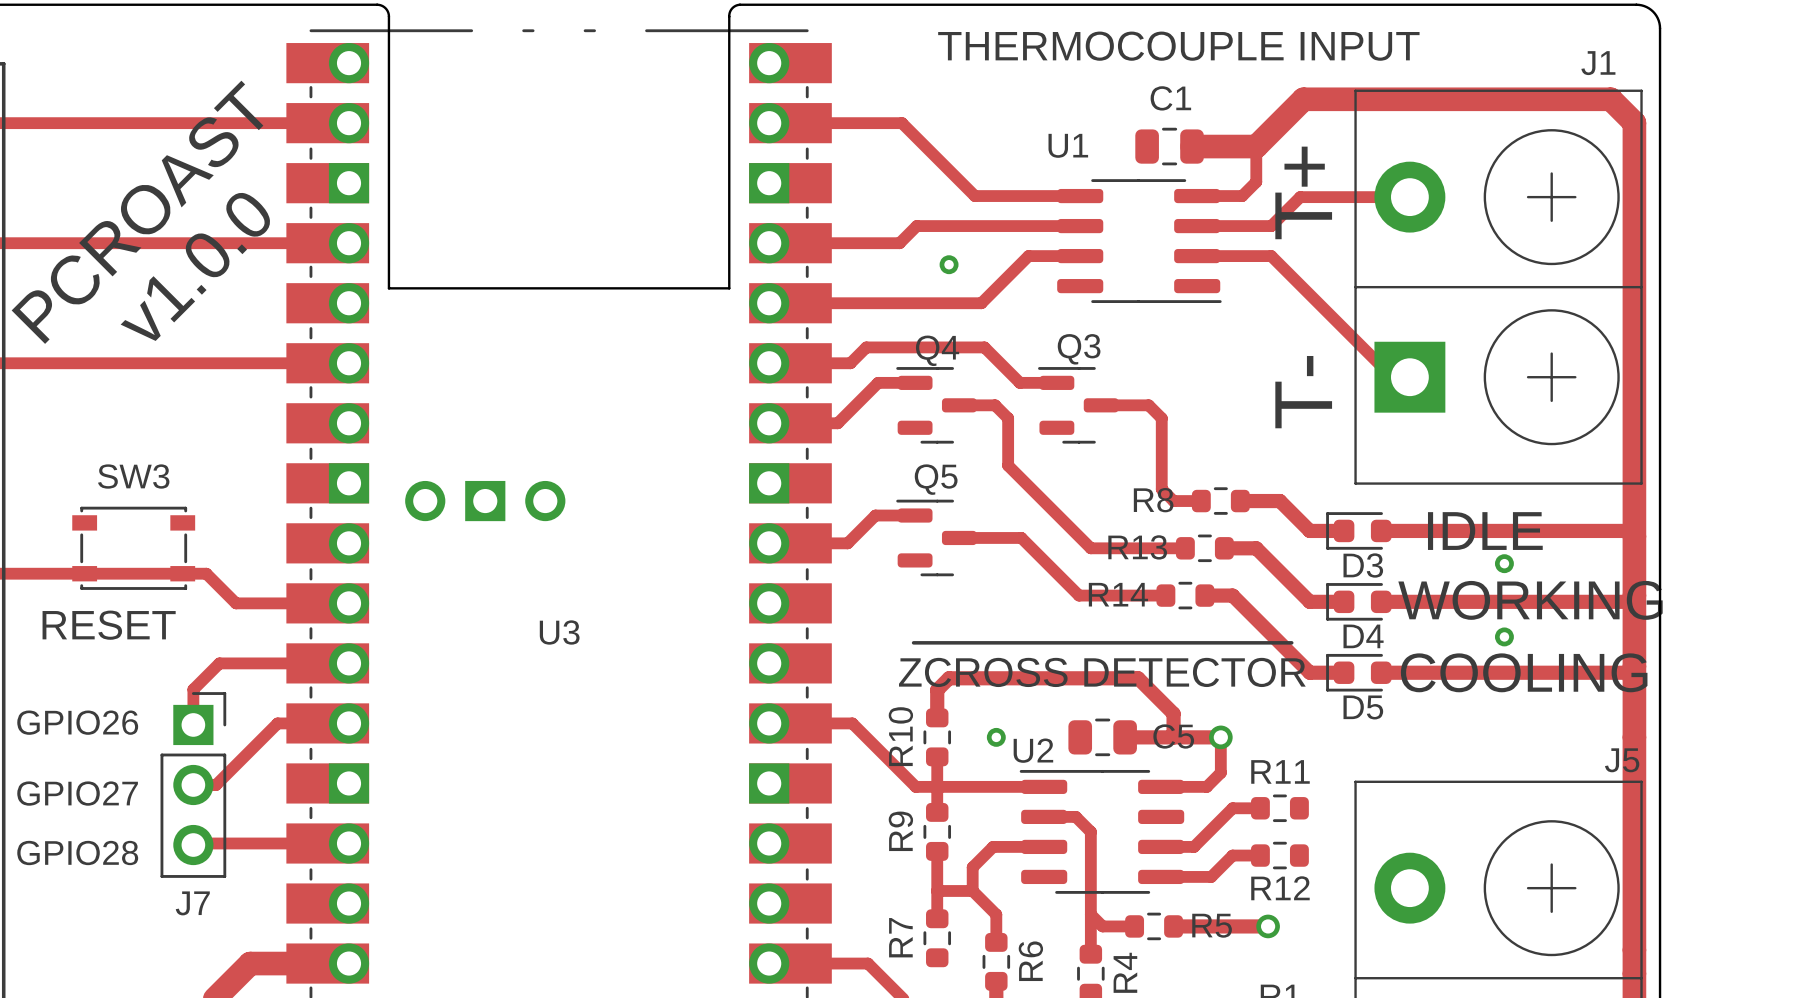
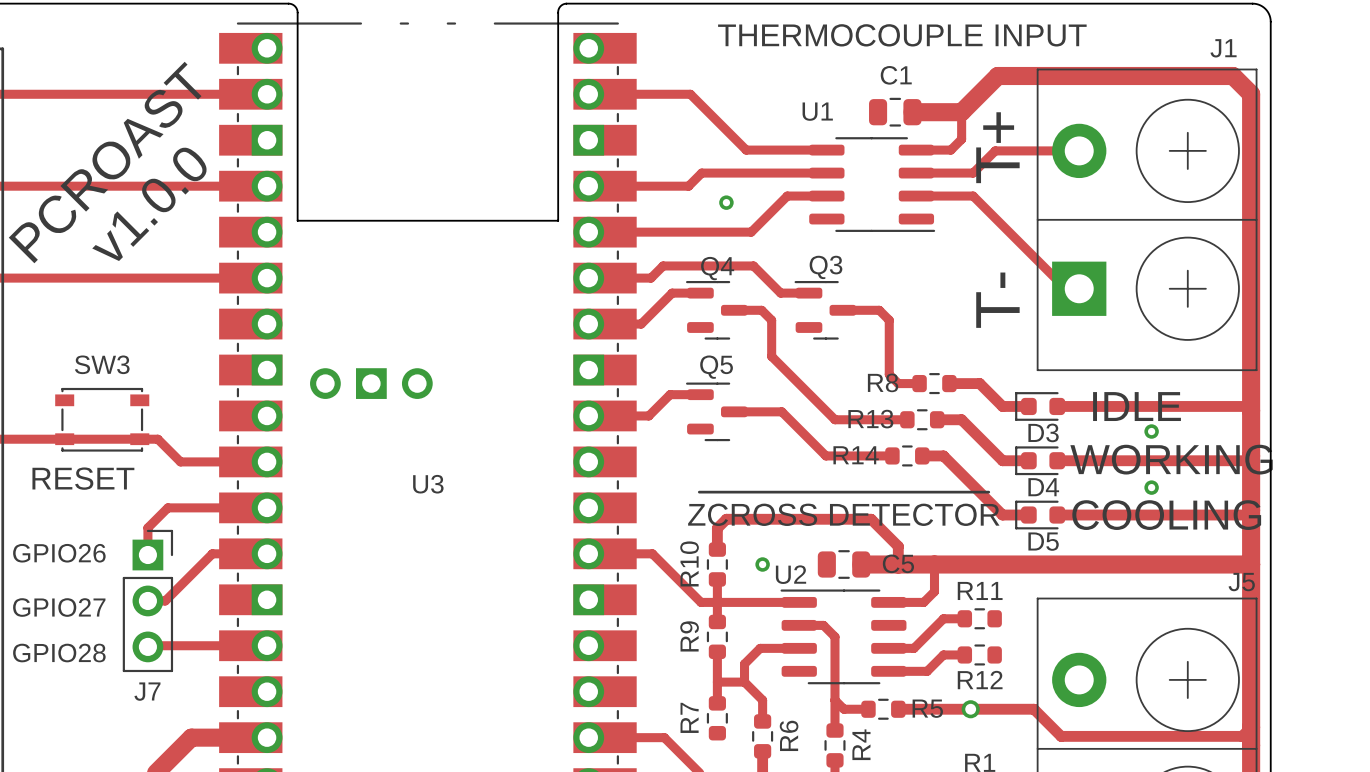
track width: thin (1125, 737) (1220, 737) -> thick (861, 564) (934, 564)
track: none -> (934, 564) (1251, 564)
via: (1220, 737) -> none
track: none -> (970, 709) (1034, 709) (1061, 736) (1242, 736) (1251, 727)

